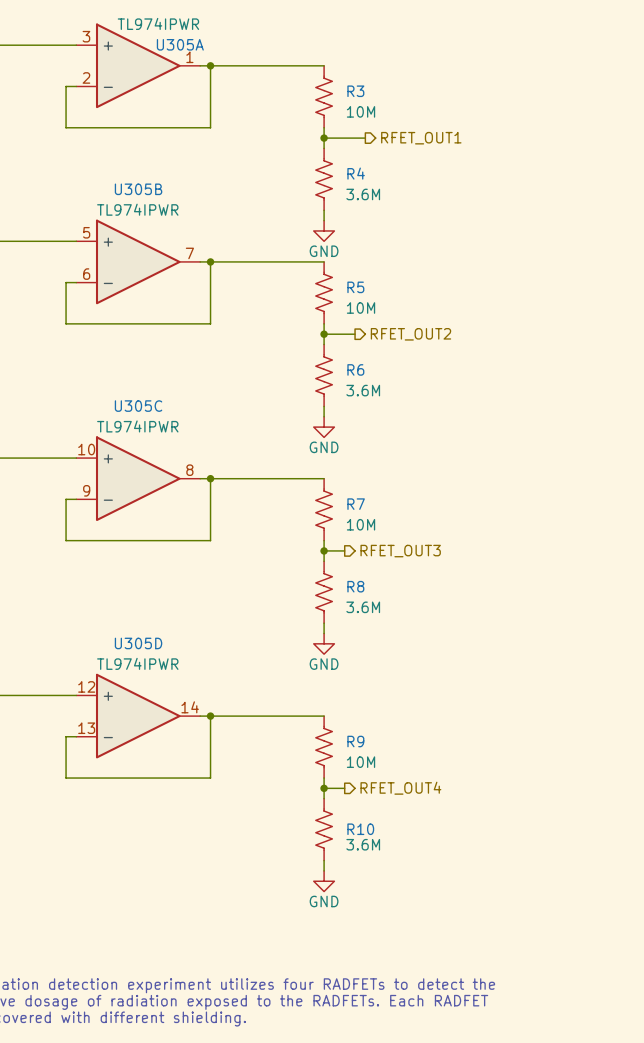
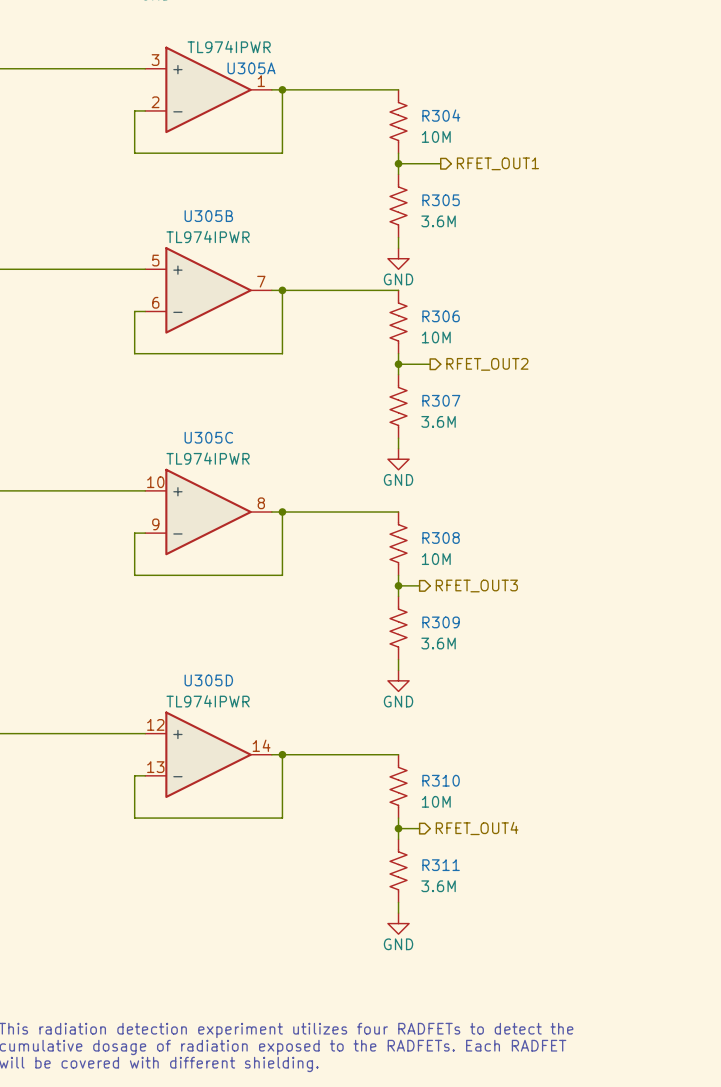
R3 name: R3 (355, 91) -> R304 (441, 115)
R4 name: R4 (356, 173) -> R305 (441, 200)
R5 name: R5 (355, 287) -> R306 (441, 316)
R6 name: R6 (355, 369) -> R307 (441, 400)
R7 name: R7 (356, 504) -> R308 (441, 537)
R8 name: R8 (355, 586) -> R309 (441, 622)
R9 name: R9 (355, 741) -> R310 (441, 780)
R10 name: R10 (360, 829) -> R311 (441, 865)

